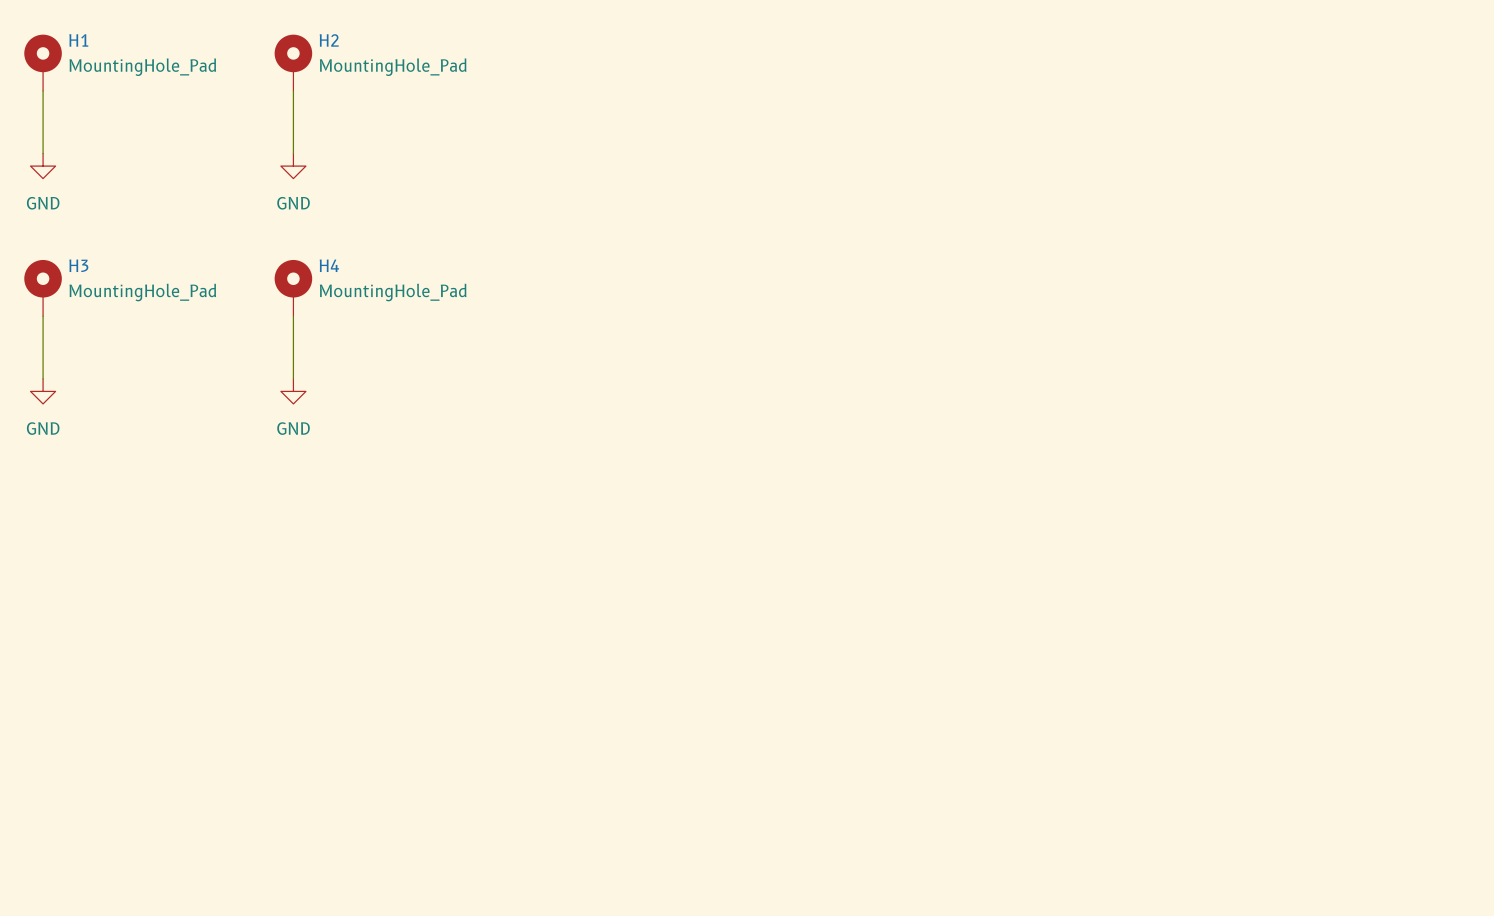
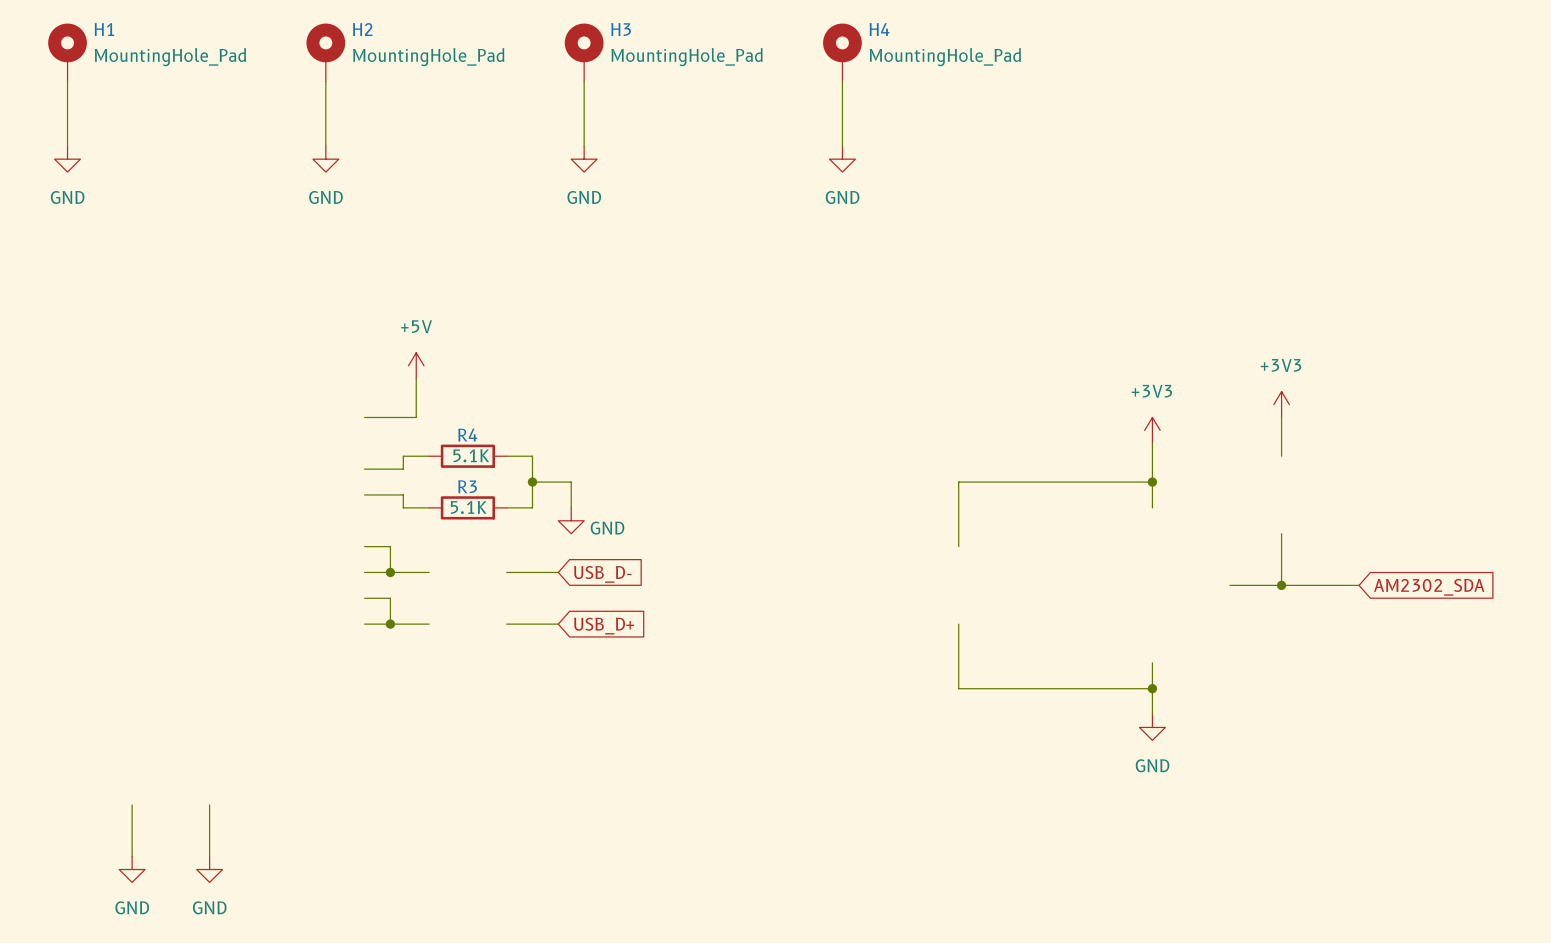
wire: none -> (584, 81) (584, 146)
wire: none -> (842, 81) (842, 146)
power symbol: none -> GND (584, 159)
power symbol: none -> GND (842, 159)
H3 position: (43, 288) -> (584, 52)
H4 position: (293, 288) -> (842, 52)
wire: (43, 316) (43, 378) -> none
wire: (293, 316) (293, 378) -> none
power symbol: none -> +5V (416, 365)
wire: none -> (416, 378) (416, 417) (364, 417)
power symbol: GND (43, 391) -> none
power symbol: GND (293, 391) -> none
power symbol: none -> +3V3 (1281, 404)
wire: none -> (1281, 417) (1281, 456)
power symbol: none -> +3V3 (1152, 430)
wire: none -> (1152, 443) (1152, 507)
wire: none -> (429, 456) (403, 456) (403, 469) (364, 469)
R4: none -> 5.1K (467, 456)
wire: none -> (506, 456) (532, 456) (532, 507) (506, 507)
wire: none -> (532, 482) (571, 482) (571, 507)
junction: none -> (532, 482)
wire: none -> (1152, 482) (958, 482) (958, 546)
junction: none -> (1152, 482)
wire: none -> (364, 494) (403, 494) (403, 507) (429, 507)
R3: none -> 5.1K (467, 507)
power symbol: none -> GND (571, 520)
wire: none -> (1281, 533) (1281, 585)
wire: none -> (364, 546) (390, 546) (390, 572)
wire: none -> (364, 572) (429, 572)
junction: none -> (390, 572)
wire: none -> (506, 572) (558, 572)
global label: none -> USB_D- (602, 574)
wire: none -> (1229, 585) (1359, 585)
junction: none -> (1281, 585)
global label: none -> AM2302_SDA (1429, 587)
wire: none -> (364, 598) (390, 598) (390, 624)
wire: none -> (364, 624) (429, 624)
junction: none -> (390, 624)
wire: none -> (506, 624) (558, 624)
wire: none -> (958, 624) (958, 688) (1152, 688)
global label: none -> USB_D+ (604, 626)
wire: none -> (1152, 662) (1152, 714)
junction: none -> (1152, 688)
power symbol: none -> GND (1152, 727)
wire: none -> (132, 804) (132, 856)
wire: none -> (209, 804) (209, 856)
power symbol: none -> GND (132, 869)
power symbol: none -> GND (209, 869)

